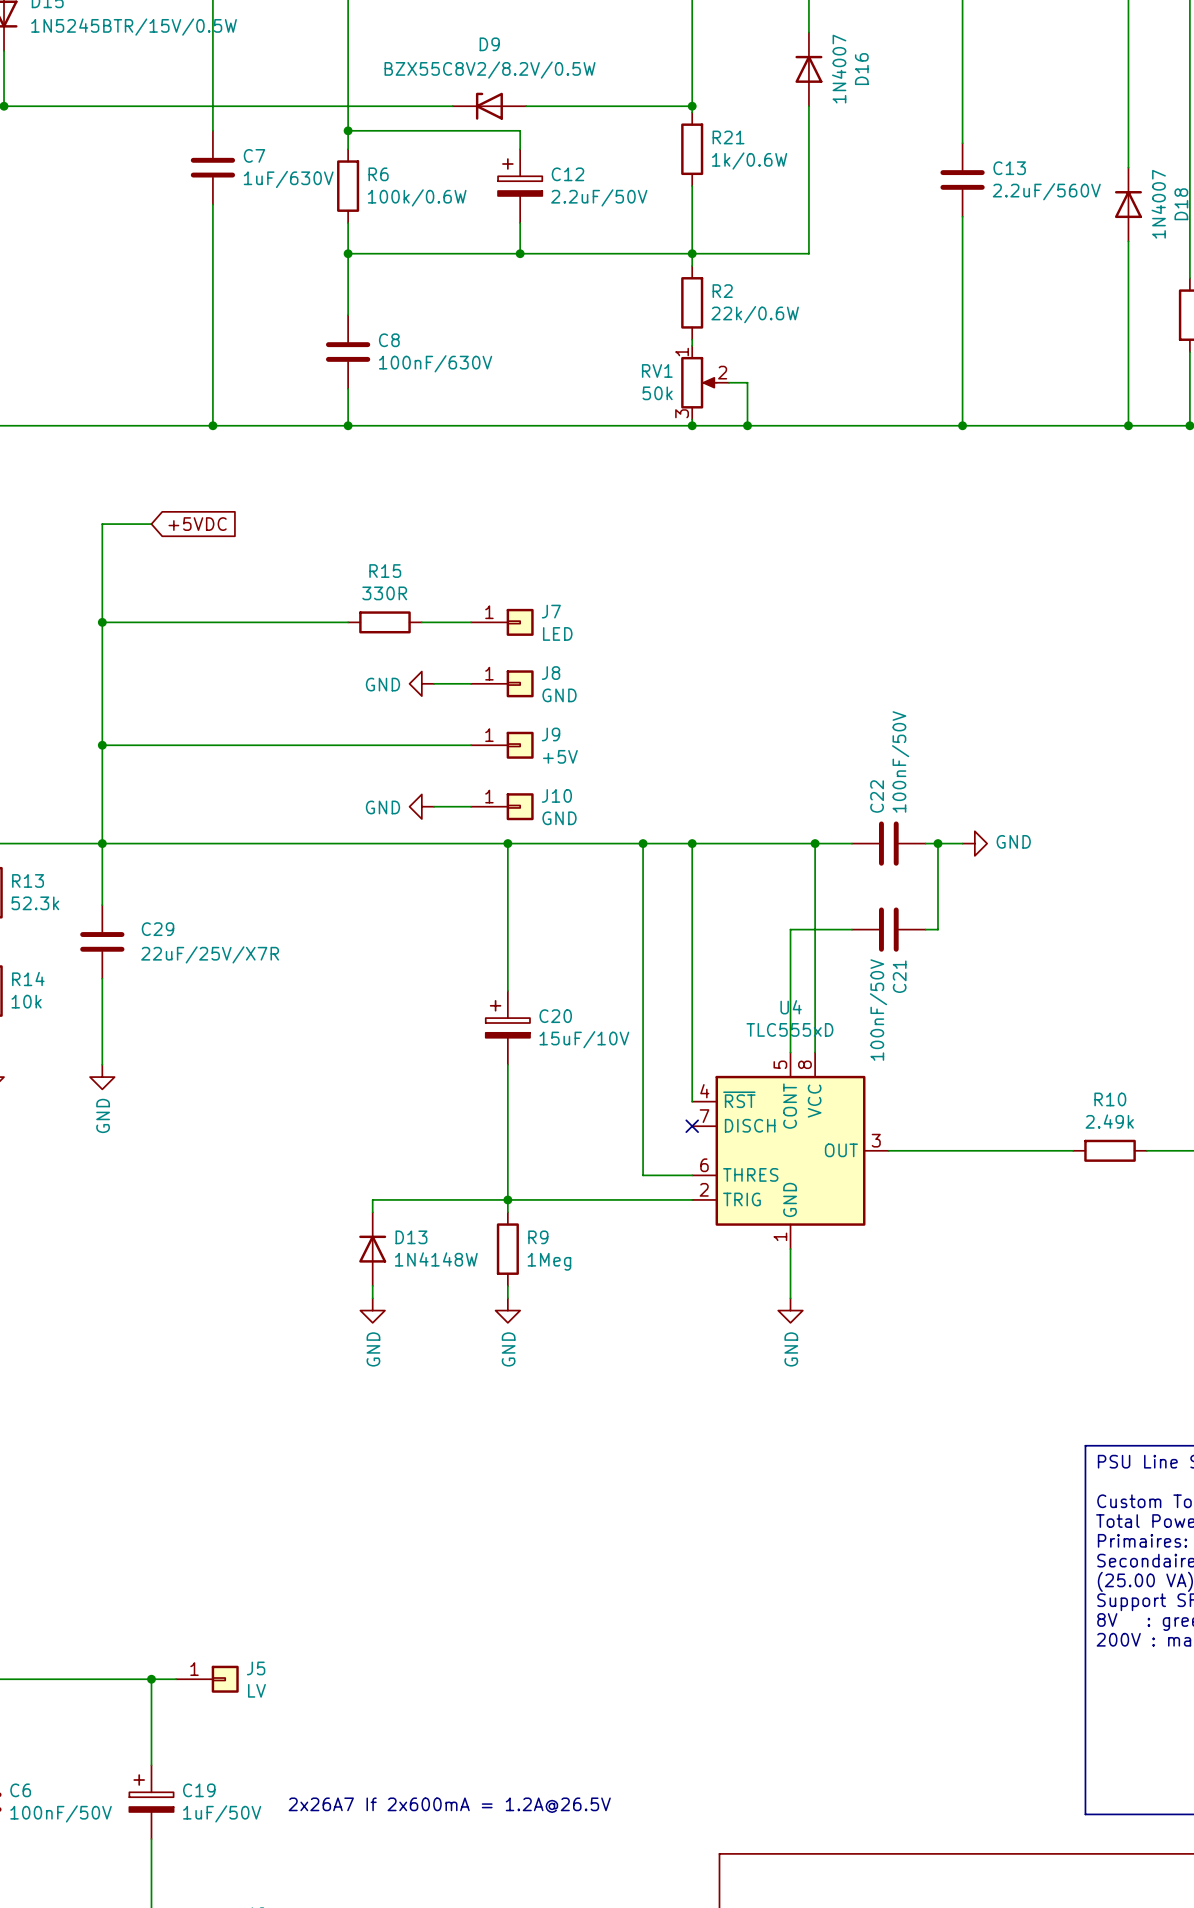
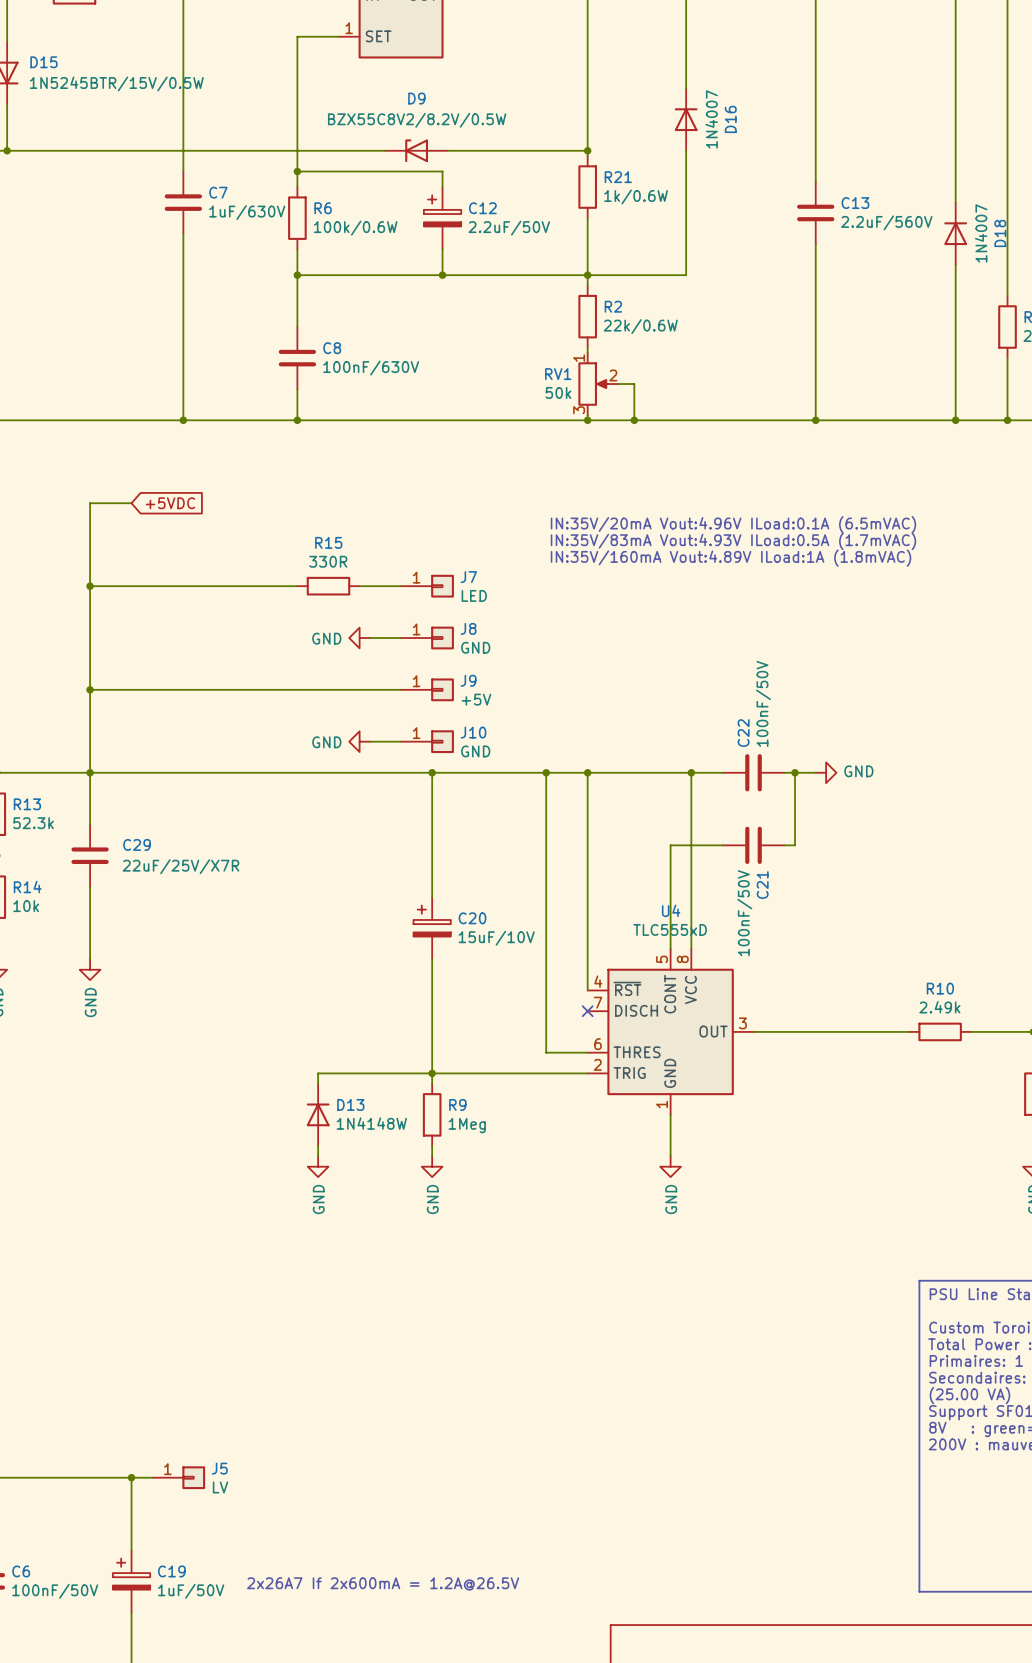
text: none -> IN:35V/20mA Vout:4.96V ILoad:0.1A (6.5mVAC) (733, 524)
text: none -> IN:35V/83mA Vout:4.93V ILoad:0.5A (1.7mVAC) (733, 541)
text: none -> IN:35V/160mA Vout:4.89V ILoad:1A (1.8mVAC) (731, 558)

